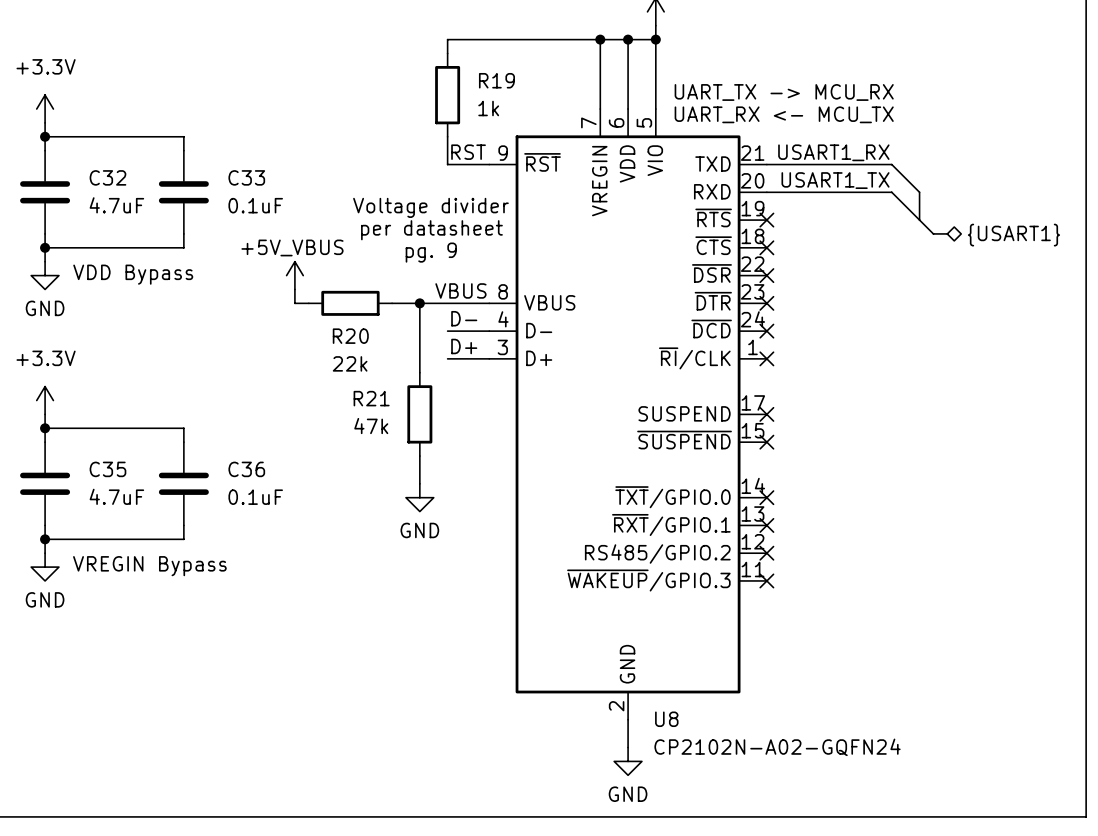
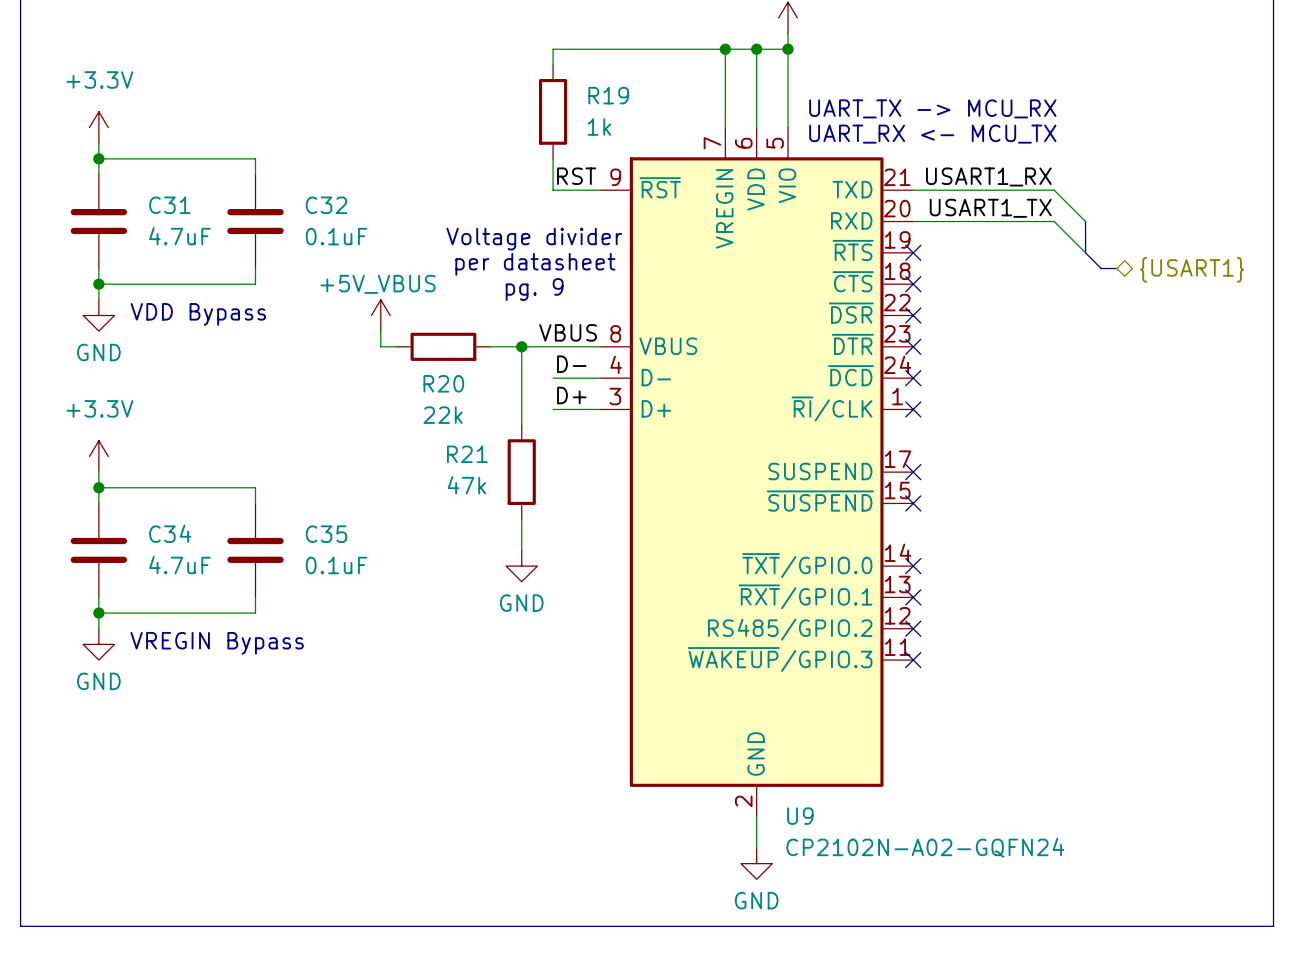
C32 name: C32 (107, 177) -> C31 (169, 205)
C33 name: C33 (246, 177) -> C32 (326, 205)
C35 name: C35 (107, 469) -> C34 (170, 533)
C36 name: C36 (246, 469) -> C35 (326, 534)
U8 name: U8 (666, 719) -> U9 (800, 816)

